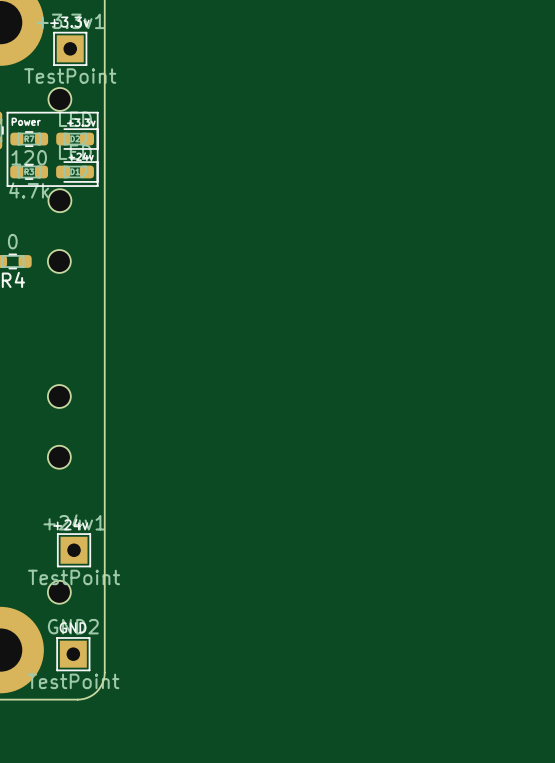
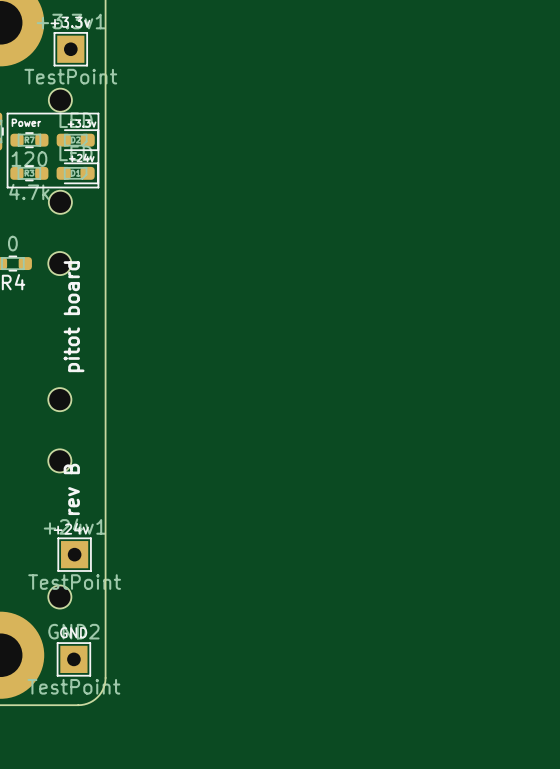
text: none -> pitot board (74, 316)
text: none -> rev B (71, 489)

